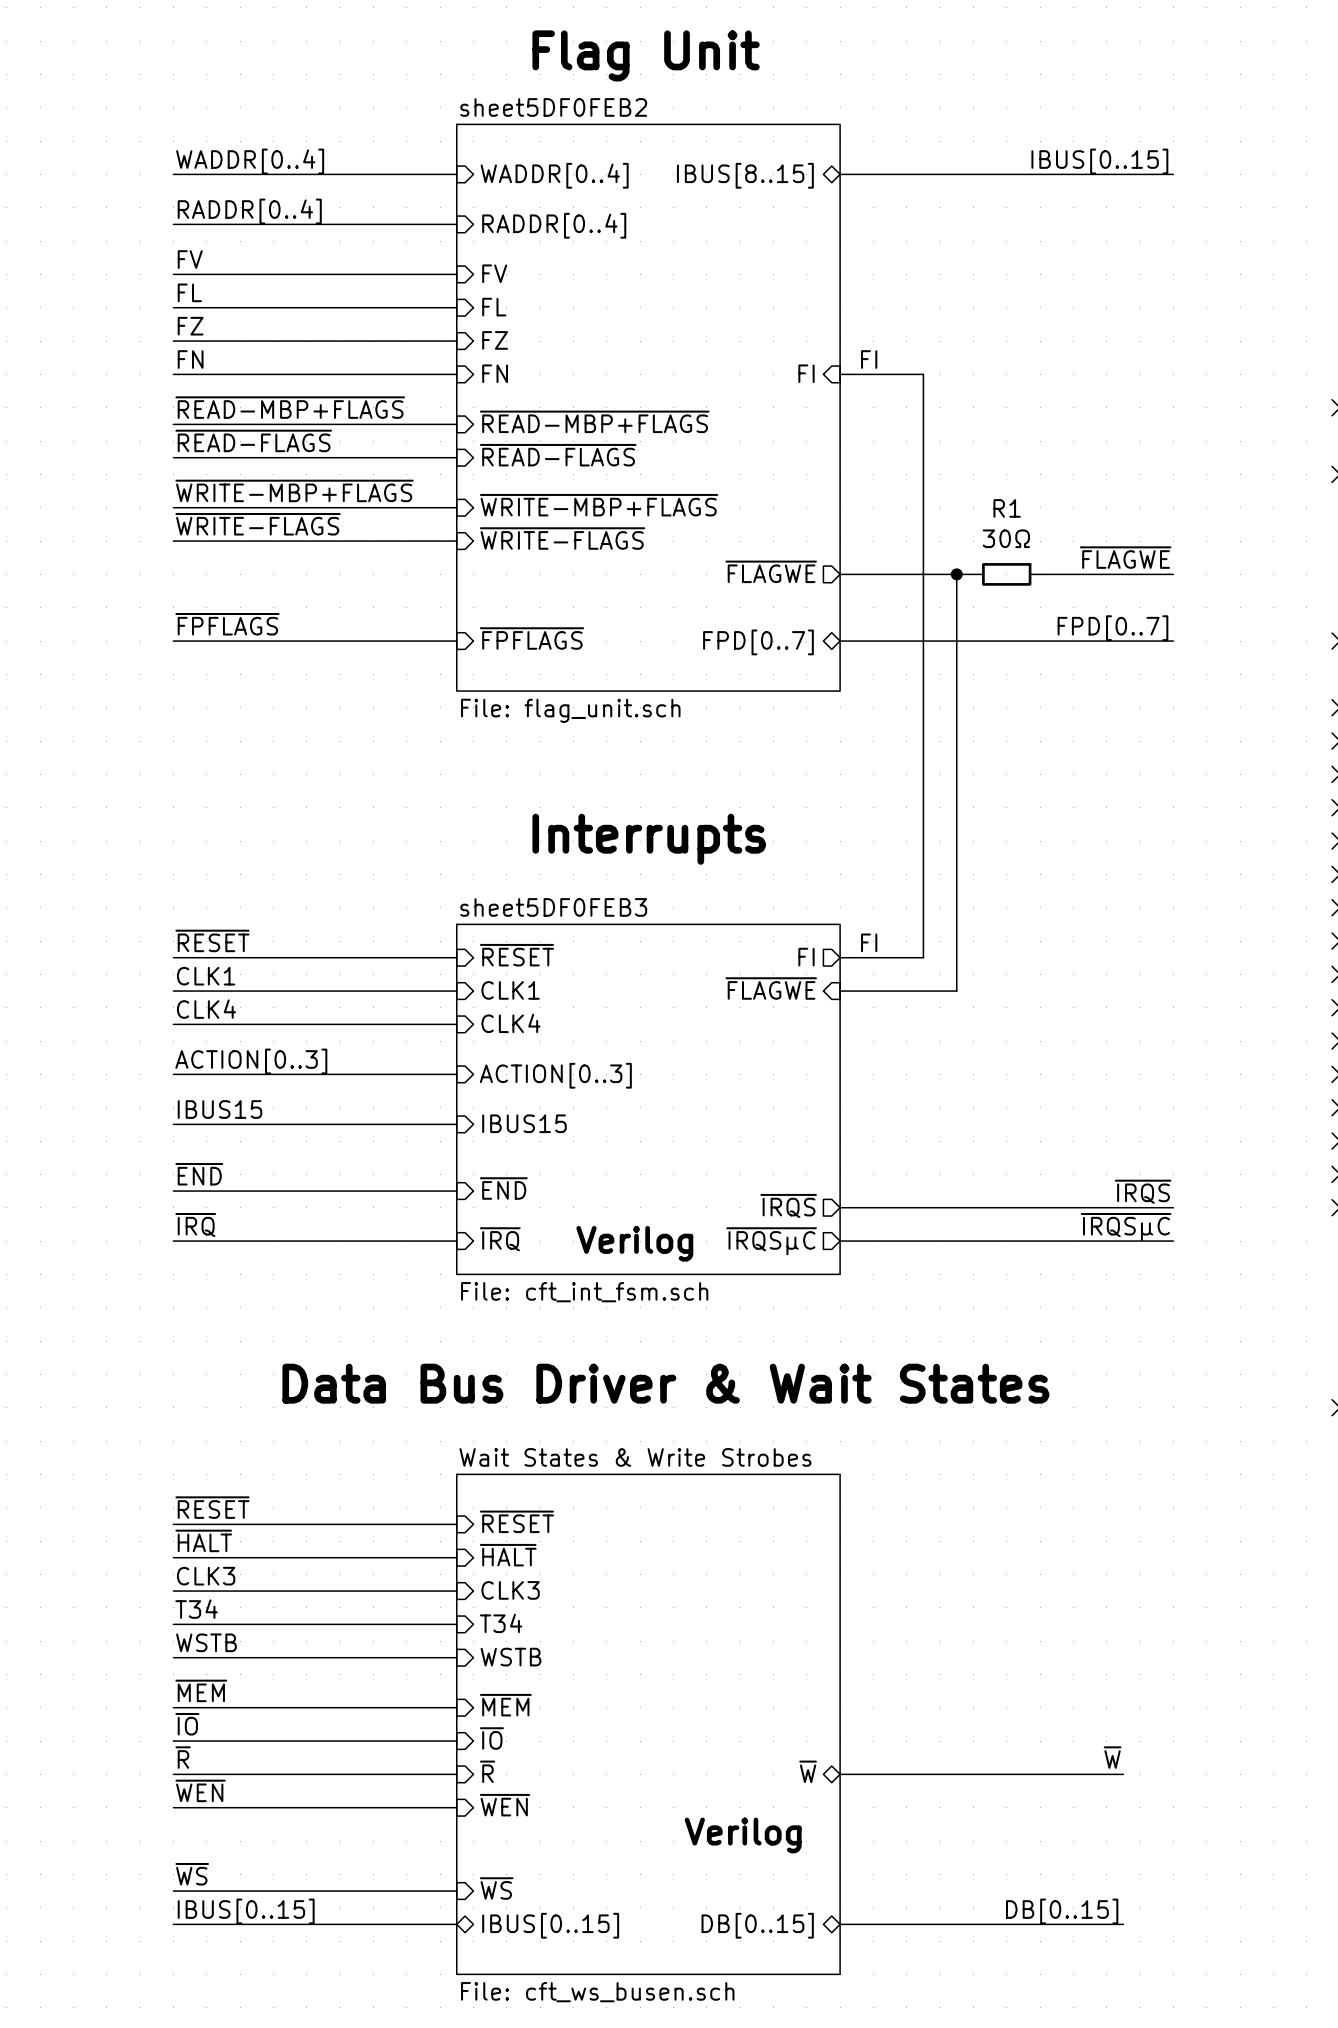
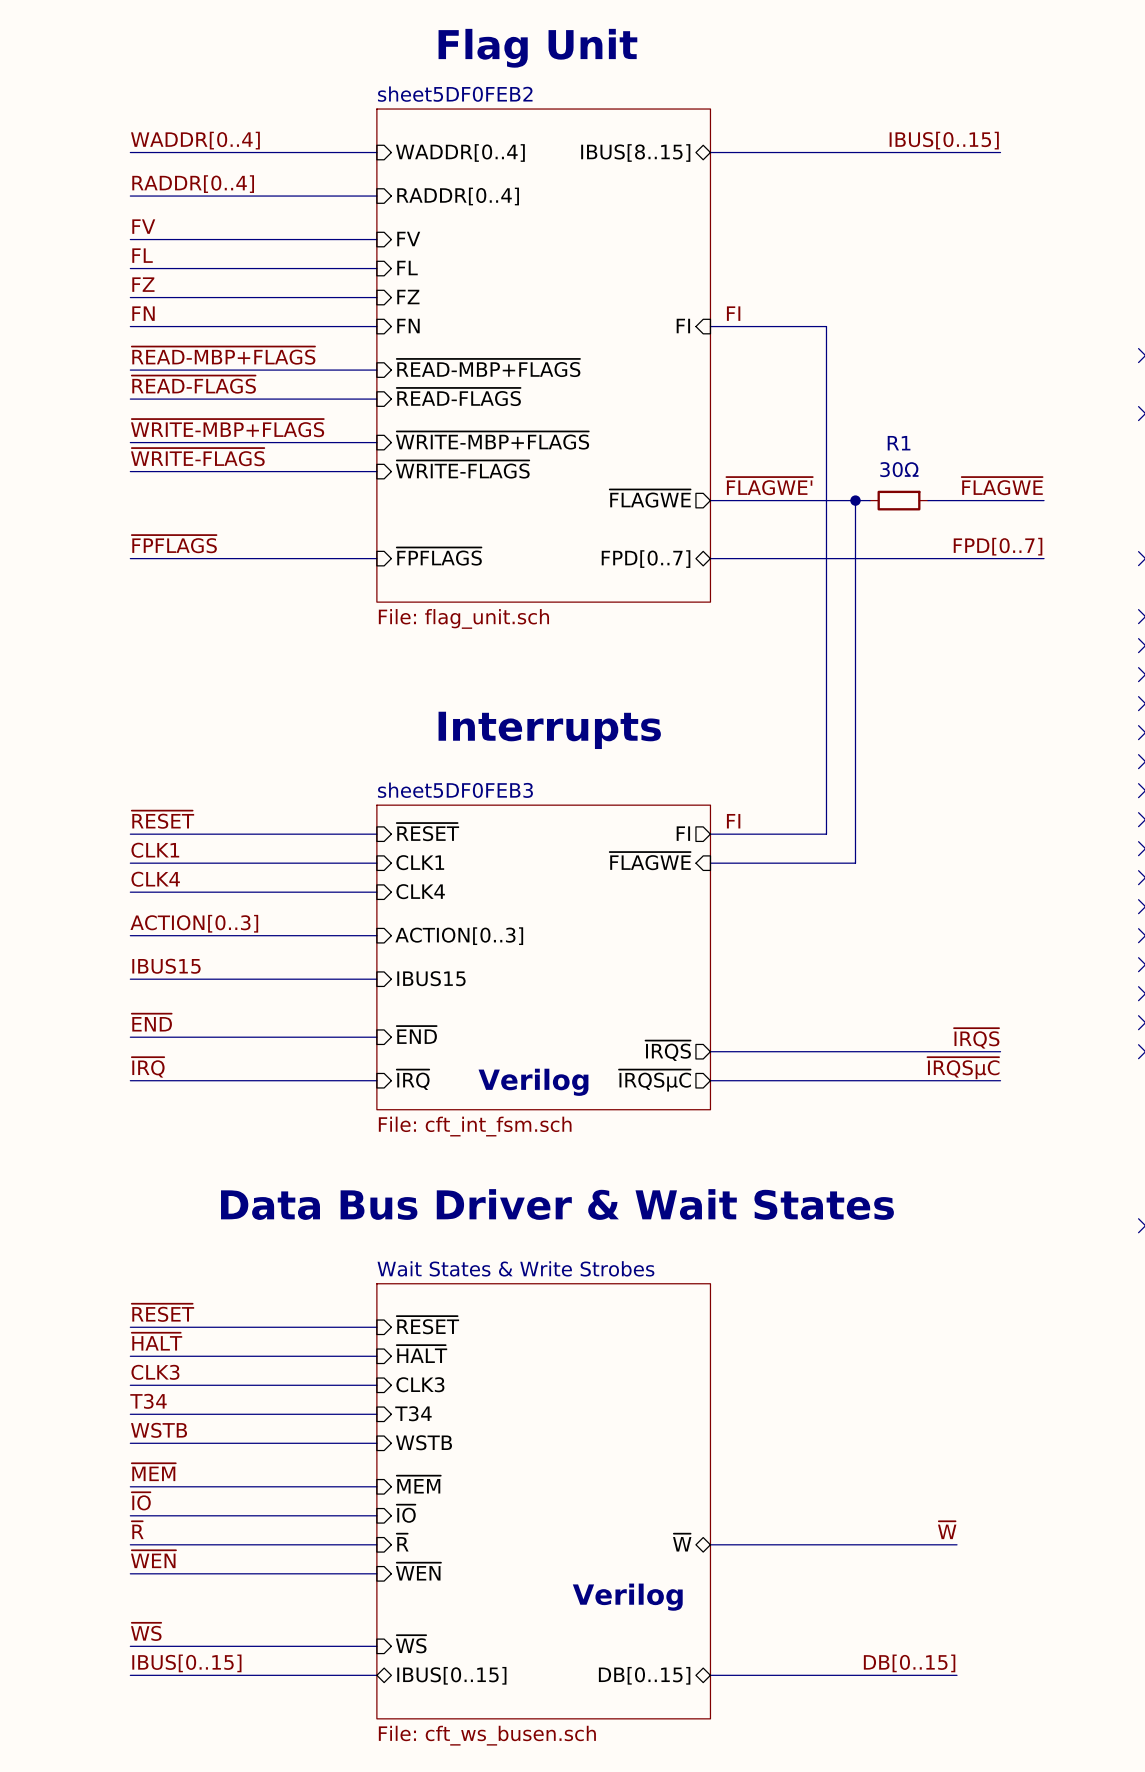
wire: (923, 374) (923, 957) -> (782, 326) (826, 326) (826, 834) (782, 834)
label: none -> ~{FLAGWE'} (769, 486)
label position: ~{FLAGWE} (1125, 557) -> ~{FLAGWE} (1002, 486)
wire: (956, 574) (956, 991) -> (855, 500) (855, 863) (811, 863)
junction position: (956, 574) -> (855, 500)
R1 position: (1006, 574) -> (899, 500)
wire: (1040, 574) (1090, 574) -> (826, 500) (869, 500)
wire: none -> (1000, 500) (1044, 500)
label position: FPD[0..7] (1112, 628) -> FPD[0..7] (998, 546)
bus: none -> (1000, 558) (1044, 558)

